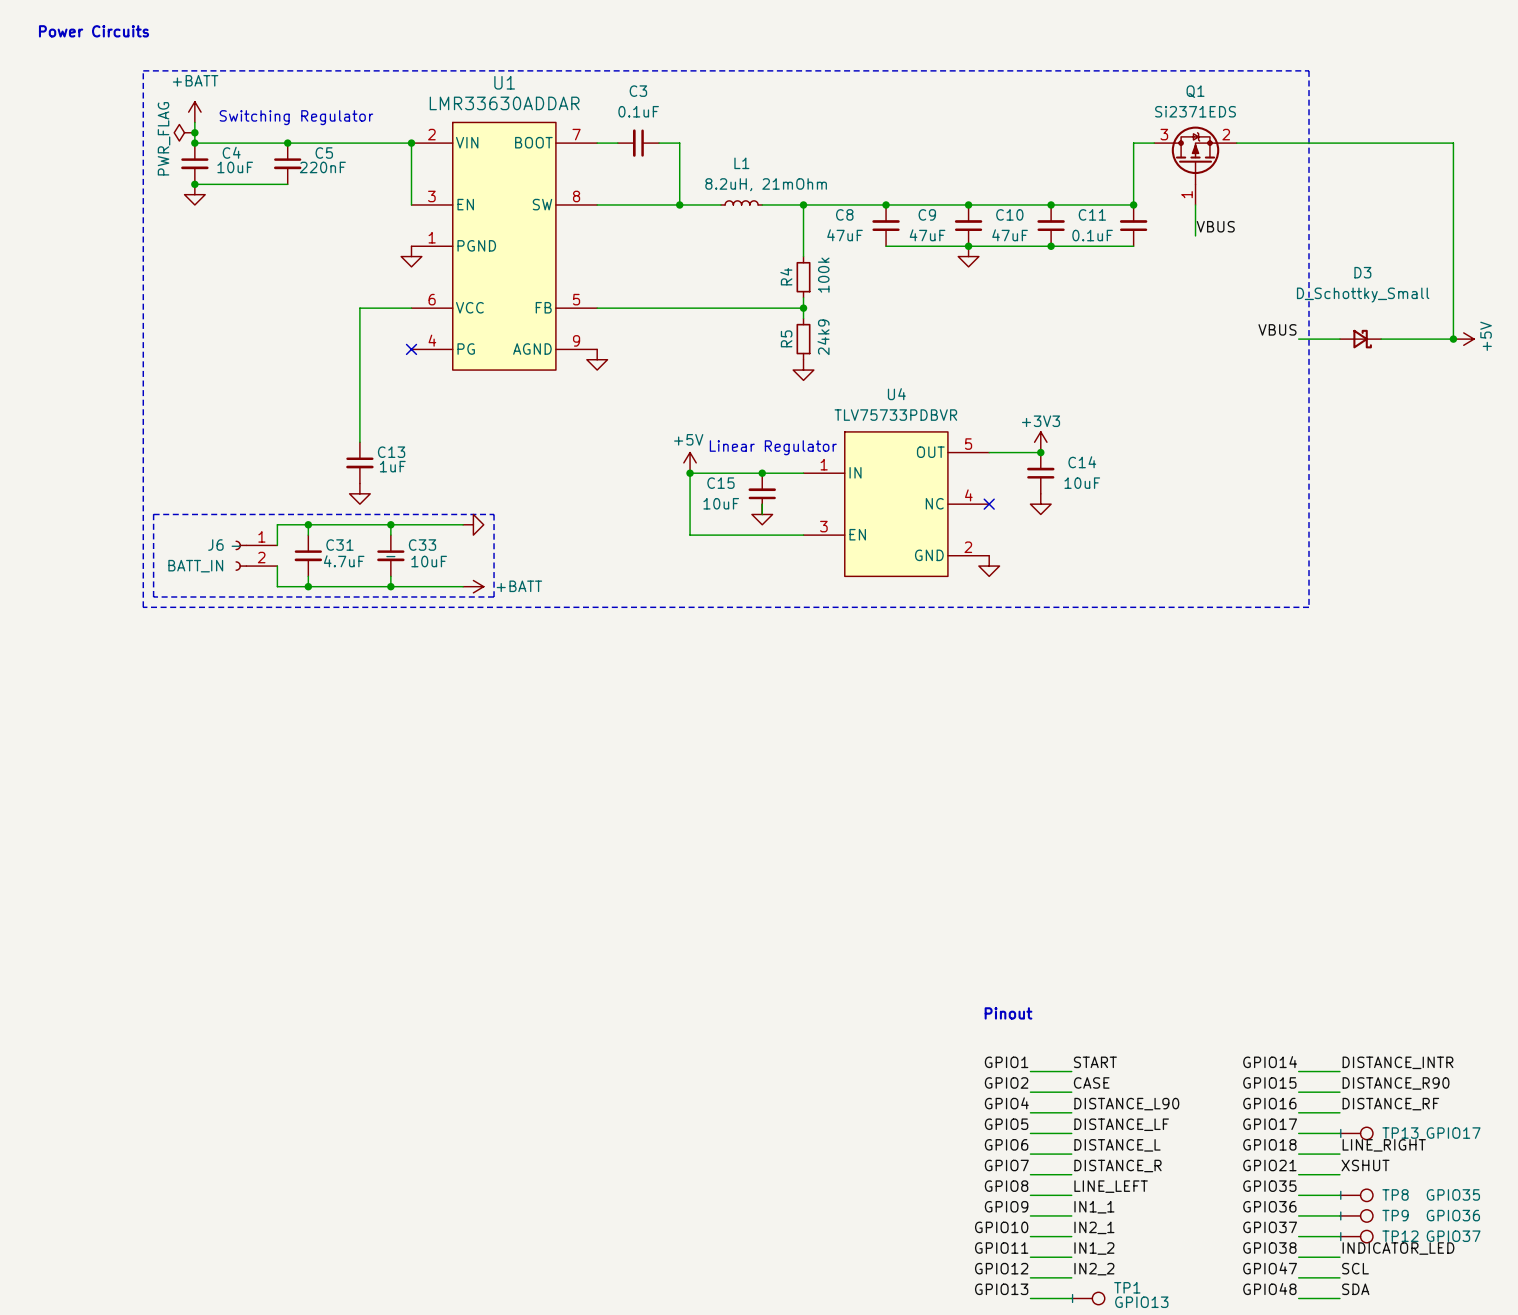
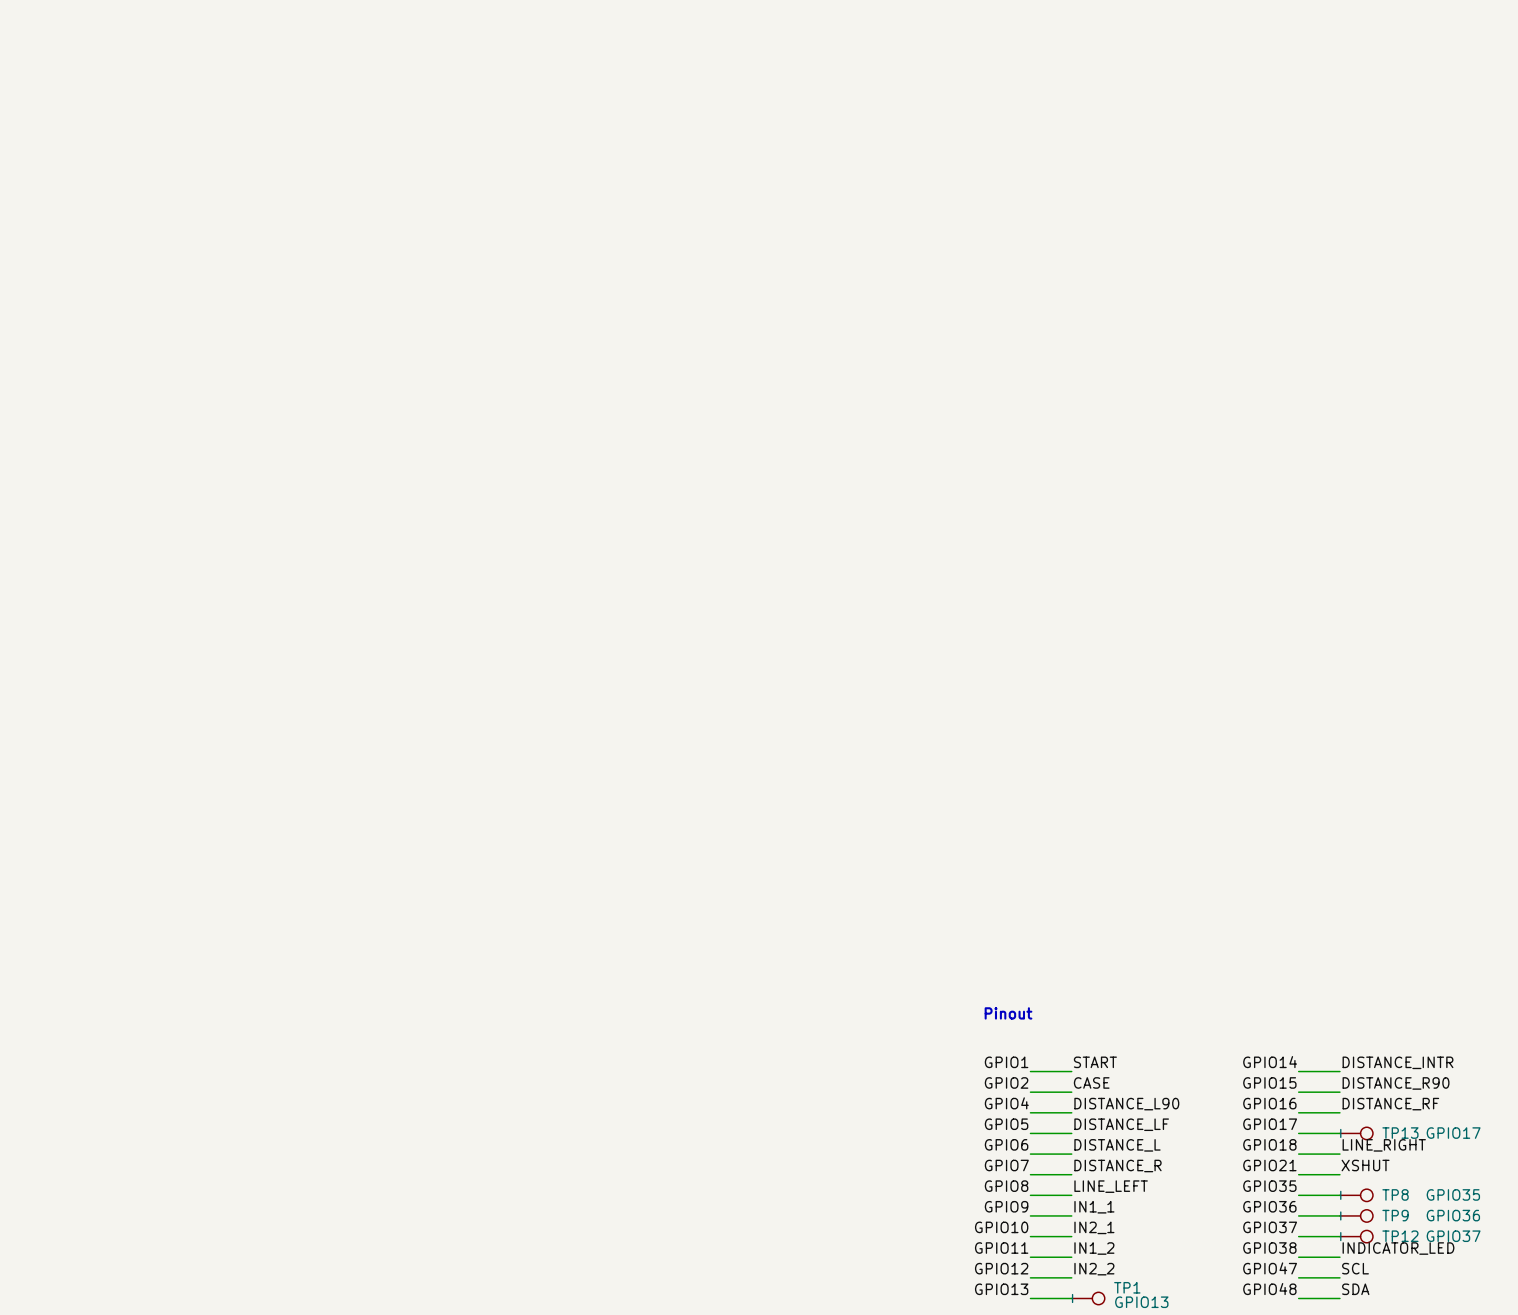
text: Power Circuits (94, 31) -> none
line: (143, 70) (1309, 70) (1309, 607) (143, 607) (143, 70) -> none
power symbol: +BATT (194, 112) -> none
text: Switching Regulator (296, 117) -> none
wire: (194, 122) (194, 143) (411, 143) (411, 204) -> none
power symbol: PWR_FLAG (184, 132) -> none
junction: (194, 132) -> none
junction: (194, 143) -> none
junction: (287, 143) -> none
junction: (411, 143) -> none
wire: (597, 143) (617, 143) -> none
C3: 0.1uF (638, 143) -> none
wire: (659, 143) (679, 143) (679, 204) -> none
wire: (1154, 143) (1133, 143) (1133, 204) (762, 204) -> none
wire: (1236, 143) (1453, 143) (1453, 339) (1381, 339) -> none
C4: 10uF (194, 163) -> none
C5: 220nF (287, 163) -> none
Q1: Si2371EDS (1195, 165) -> none
wire: (194, 184) (287, 184) -> none
junction: (194, 184) -> none
power symbol: (194, 194) -> none
L1: 8.2uH, 21mOhm (741, 202) -> none
wire: (597, 204) (720, 204) -> none
junction: (679, 204) -> none
wire: (803, 204) (803, 256) -> none
junction: (803, 204) -> none
junction: (886, 204) -> none
junction: (968, 204) -> none
junction: (1051, 204) -> none
junction: (1133, 204) -> none
wire: (1195, 204) (1195, 235) -> none
C8: 47uF (886, 225) -> none
C9: 47uF (968, 225) -> none
C10: 47uF (1051, 225) -> none
C11: 0.1uF (1133, 225) -> none
label: VBUS (1215, 226) -> none
U1: LMR33630ADDAR (504, 246) -> none
wire: (886, 246) (1133, 246) -> none
junction: (968, 246) -> none
junction: (1051, 246) -> none
power symbol: (411, 256) -> none
power symbol: (968, 256) -> none
R4: 100k (803, 277) -> none
wire: (803, 297) (803, 318) -> none
wire: (411, 308) (359, 308) (359, 442) -> none
wire: (597, 308) (803, 308) -> none
junction: (803, 308) -> none
label: VBUS (1277, 329) -> none
R5: 24k9 (803, 339) -> none
wire: (1298, 339) (1339, 339) -> none
D3: D_Schottky_Small (1360, 339) -> none
junction: (1453, 339) -> none
power symbol: +5V (1463, 339) -> none
no-connect mark: (411, 349) -> none
power symbol: (597, 359) -> none
power symbol: (803, 370) -> none
power symbol: +3V3 (1040, 442) -> none
text: Linear Regulator (773, 447) -> none
wire: (989, 452) (1040, 452) -> none
junction: (1040, 452) -> none
C13: 1uF (359, 462) -> none
power symbol: +5V (690, 462) -> none
junction: (690, 473) -> none
junction: (762, 473) -> none
wire: (803, 473) (690, 473) (690, 535) (803, 535) -> none
C14: 10uF (1040, 473) -> none
power symbol: (359, 493) -> none
C15: 10uF (762, 493) -> none
wire: (762, 504) (762, 514) -> none
U4: TLV75733PDBVR (896, 504) -> none
no-connect mark: (989, 504) -> none
power symbol: (1040, 504) -> none
line: (153, 514) (494, 514) (494, 597) (153, 597) (153, 514) -> none
power symbol: (762, 514) -> none
wire: (308, 524) (308, 535) -> none
junction: (308, 524) -> none
wire: (390, 524) (390, 535) -> none
junction: (390, 524) -> none
wire: (463, 524) (277, 524) (277, 545) -> none
power symbol: (473, 524) -> none
J6: BATT_IN (256, 555) -> none
C31: 4.7uF (308, 555) -> none
C33: 10uF (390, 555) -> none
wire: (277, 566) (277, 586) (463, 586) -> none
power symbol: (989, 566) -> none
wire: (308, 576) (308, 586) -> none
wire: (390, 576) (390, 586) -> none
junction: (308, 586) -> none
junction: (390, 586) -> none
power symbol: +BATT (473, 586) -> none

